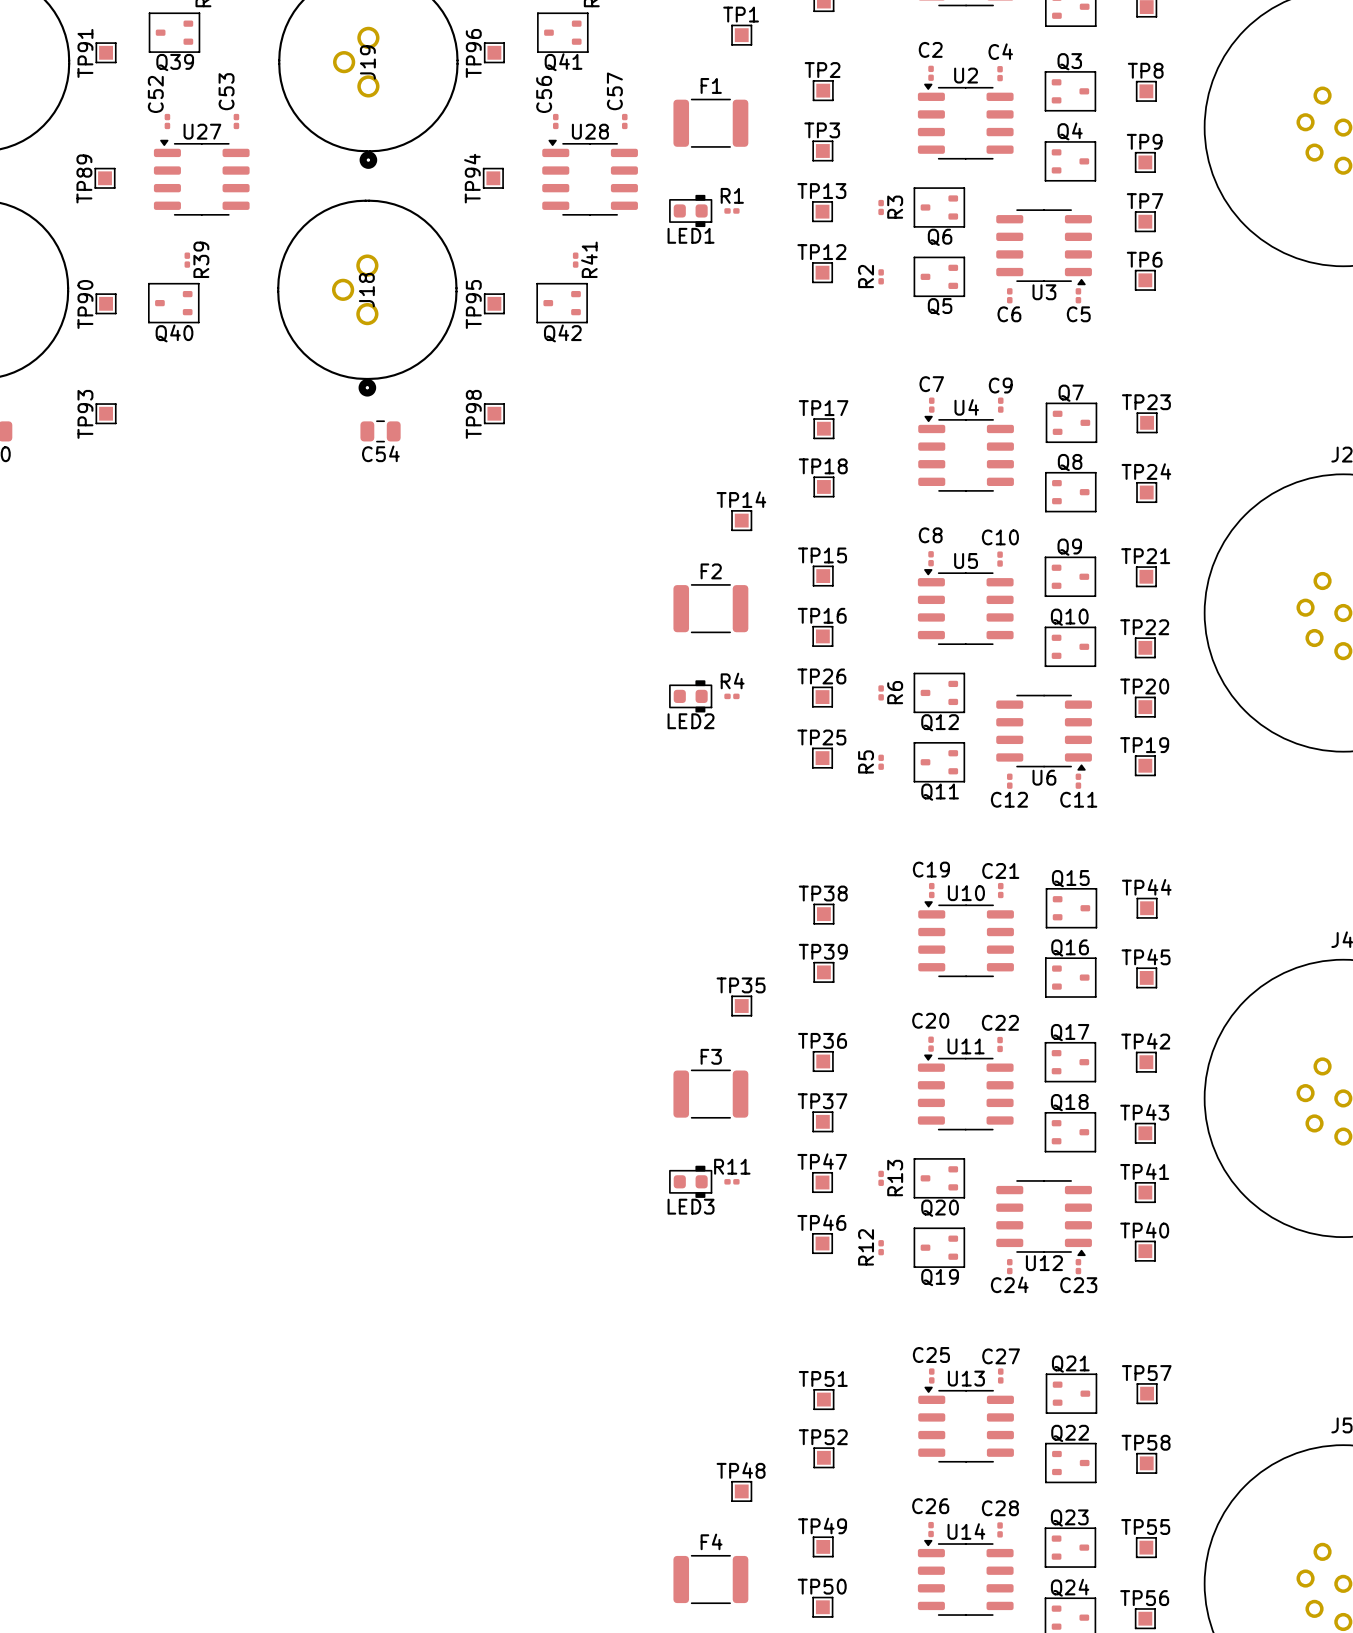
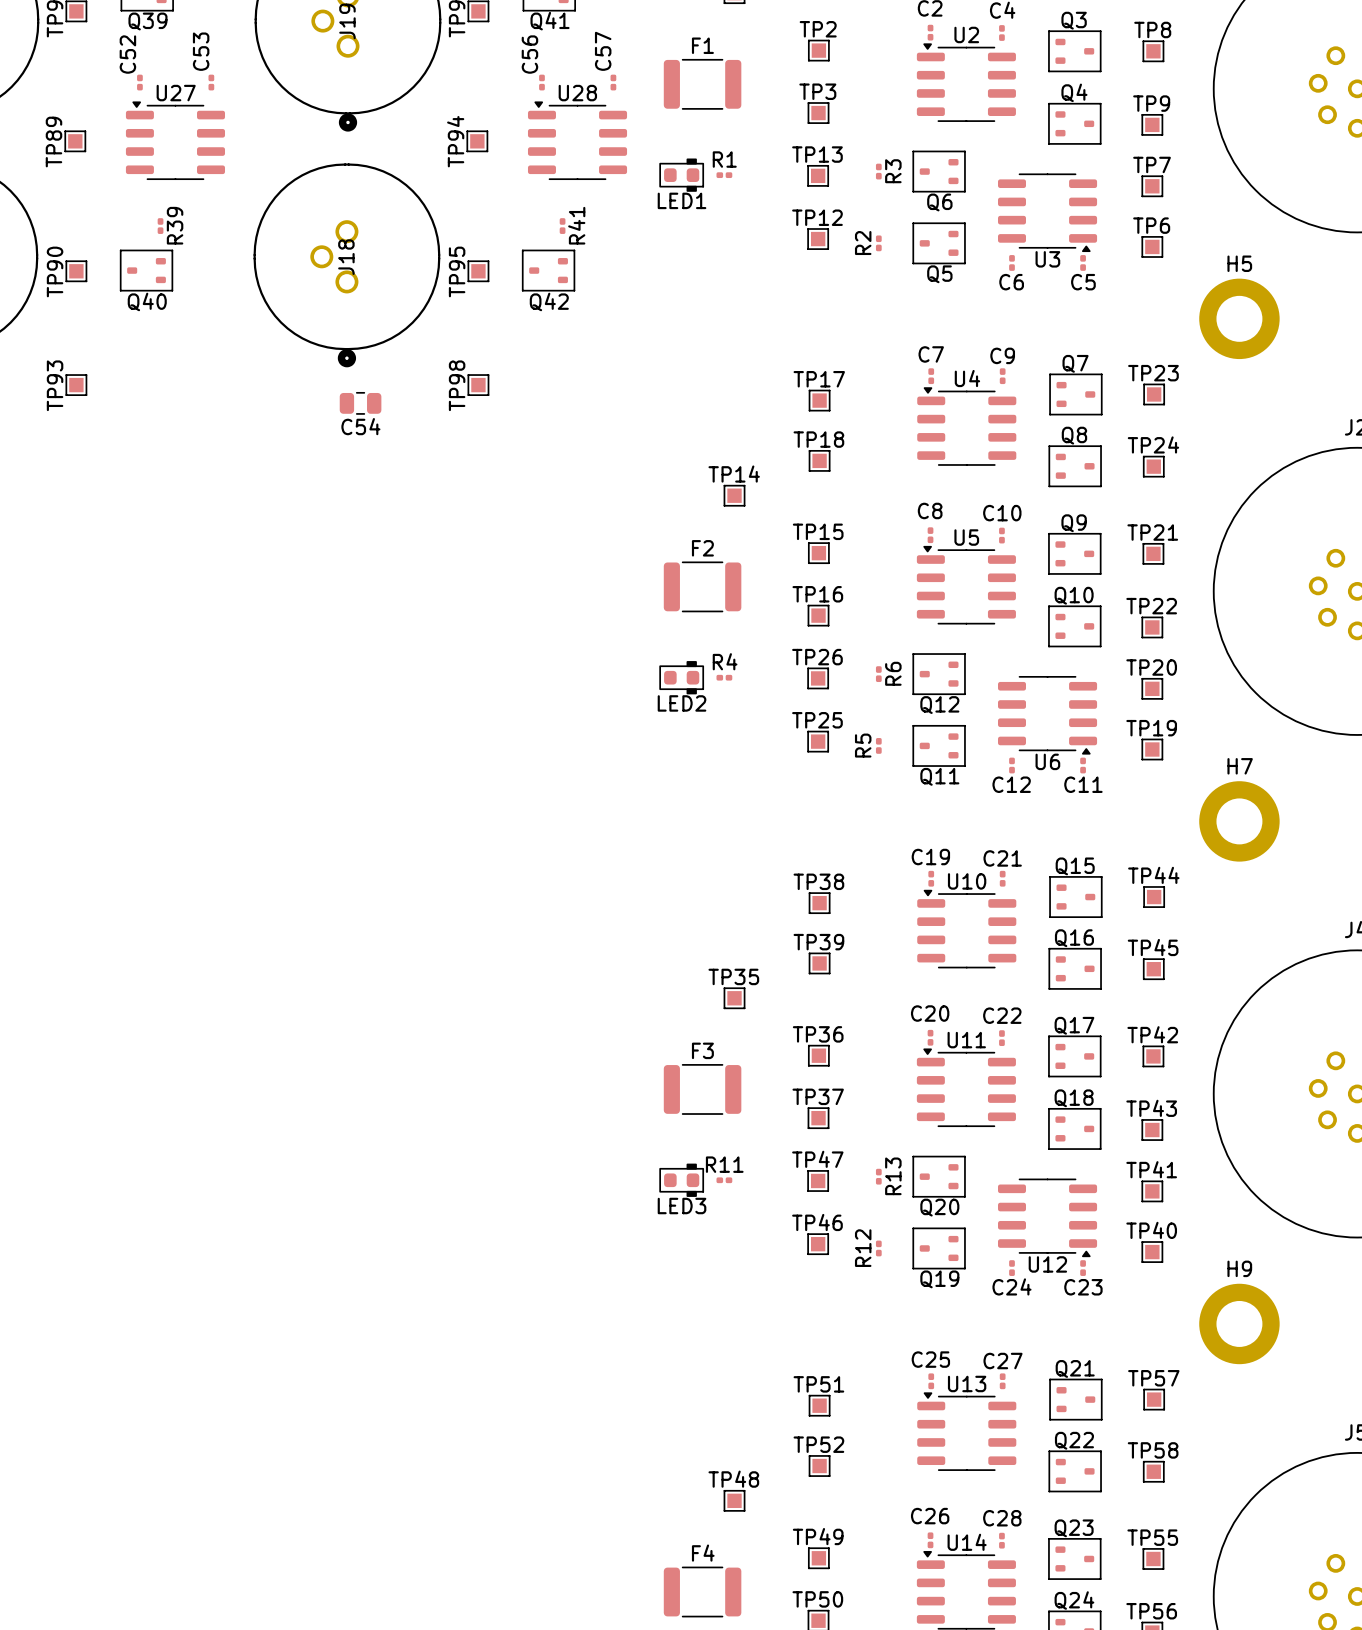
H5: none -> (1239, 318)
H7: none -> (1239, 821)
H9: none -> (1239, 1323)

